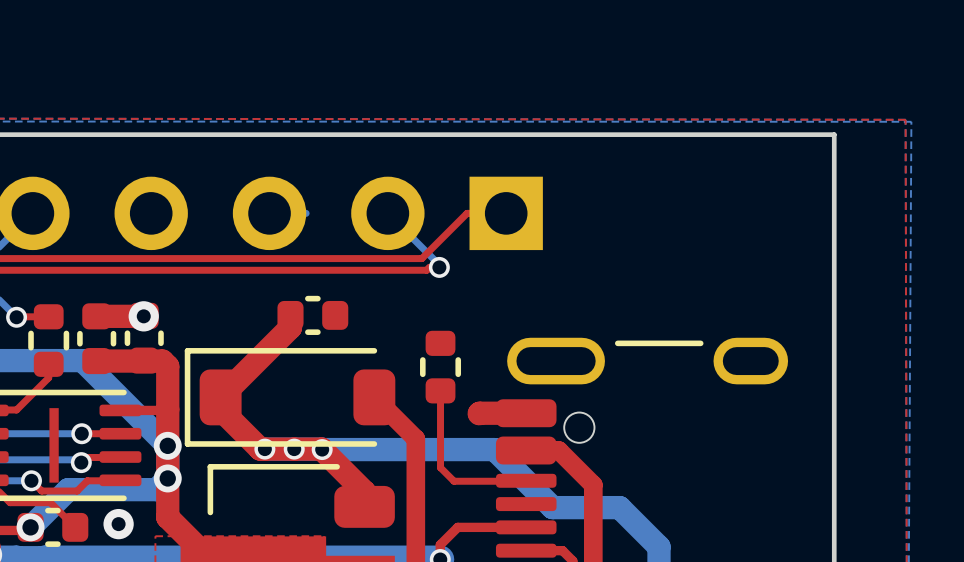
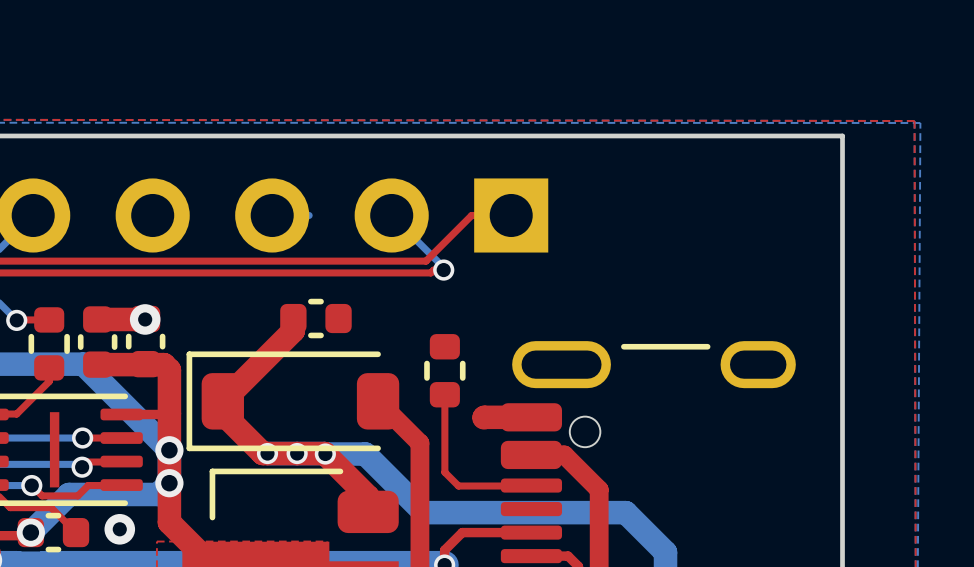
bottom track: (361, 449) (494, 449) (552, 507) -> (365, 454) (423, 512) (558, 512)

